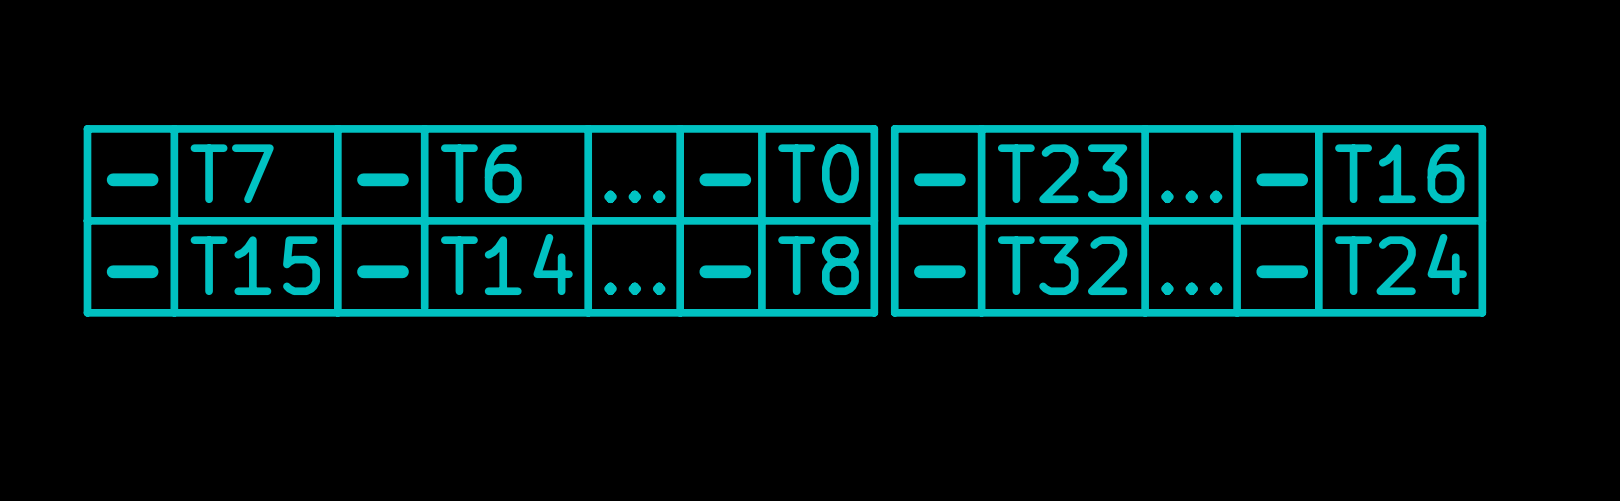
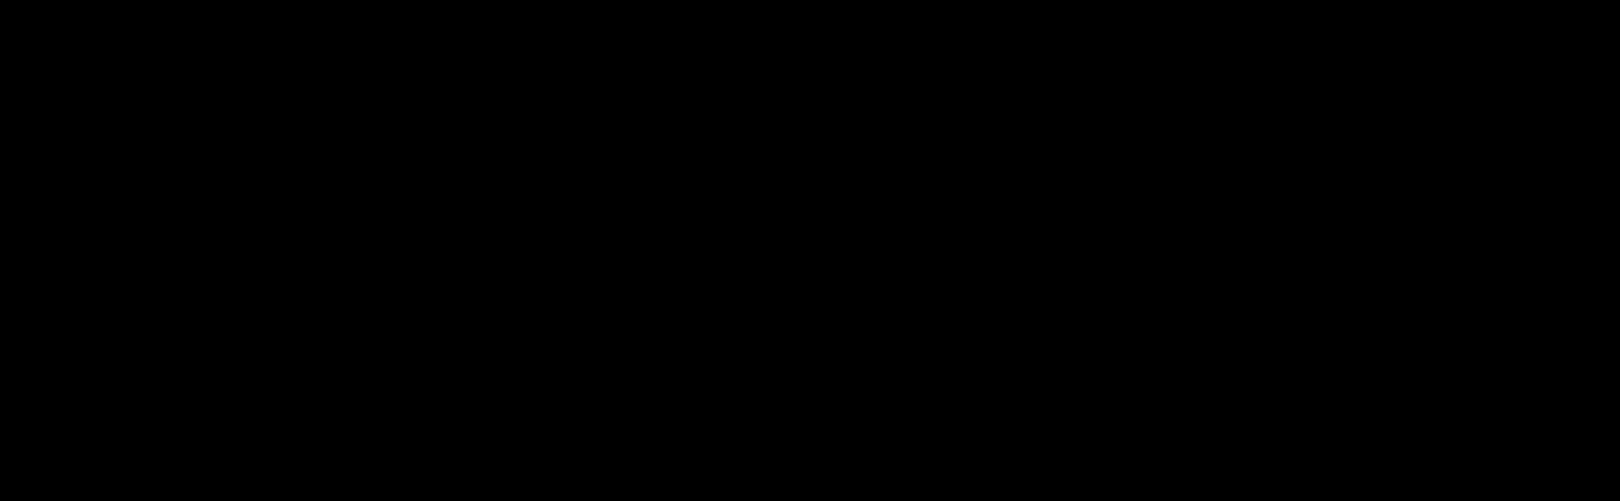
line: (87, 128) (874, 128) (874, 312) (87, 312) (87, 128) -> none
line: (174, 128) (174, 312) -> none
line: (337, 128) (337, 312) -> none
line: (424, 128) (424, 307) -> none
line: (588, 128) (588, 312) -> none
line: (680, 128) (680, 312) -> none
line: (894, 128) (1482, 128) (1482, 312) (894, 312) (894, 128) -> none
line: (981, 128) (981, 312) -> none
line: (1145, 128) (1145, 312) -> none
line: (1237, 128) (1237, 312) -> none
line: (761, 131) (761, 310) -> none
line: (1318, 131) (1318, 310) -> none
text: T7 (232, 173) -> none
text: T6 (481, 173) -> none
text: T0 (818, 173) -> none
text: T23 (1062, 173) -> none
text: T16 (1399, 173) -> none
text: - (132, 179) -> none
text: - (382, 179) -> none
text: - (725, 179) -> none
text: - (939, 179) -> none
text: - (1282, 179) -> none
text: ... (634, 196) -> none
text: ... (1191, 196) -> none
line: (87, 220) (874, 220) -> none
line: (894, 220) (1482, 220) -> none
text: T14 (506, 264) -> none
text: T24 (1401, 264) -> none
text: T15 (255, 265) -> none
text: T8 (818, 265) -> none
text: T32 (1062, 265) -> none
text: - (132, 271) -> none
text: - (382, 271) -> none
text: - (725, 271) -> none
text: - (939, 271) -> none
text: - (1282, 271) -> none
text: ... (634, 288) -> none
text: ... (1191, 288) -> none

